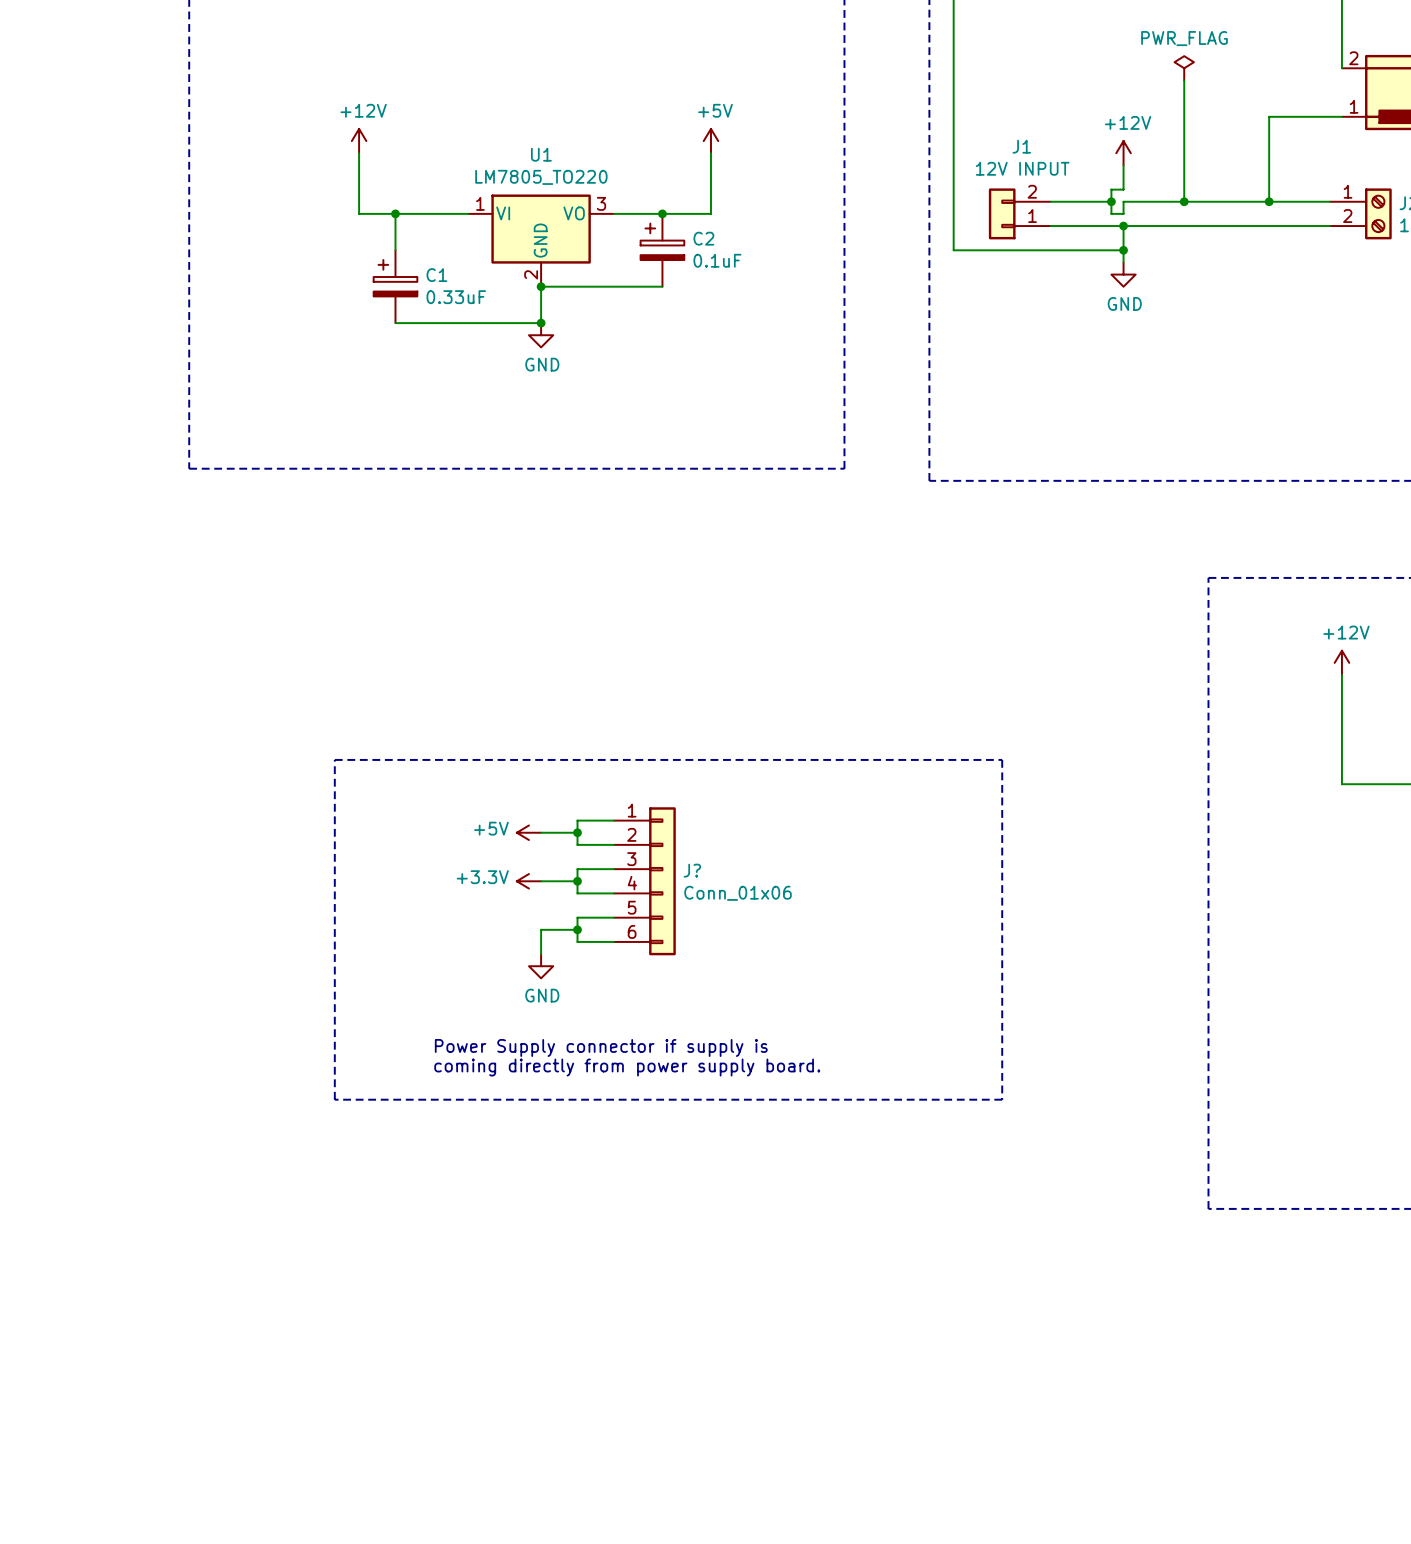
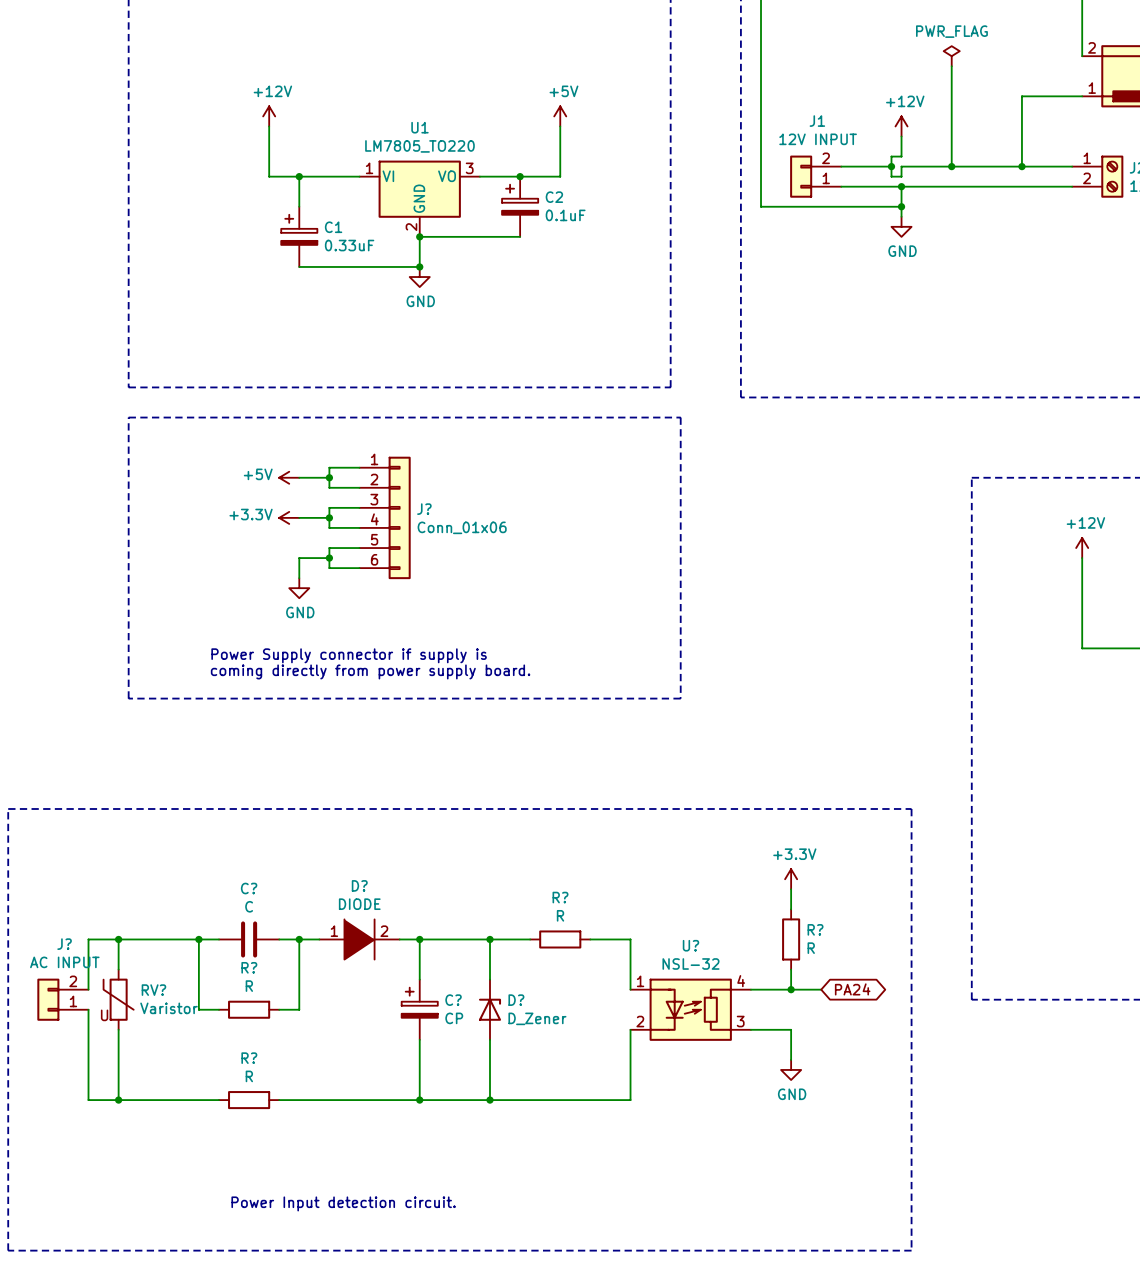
line: none -> (128, 417) (128, 698) (680, 698) (680, 417) (128, 417)
wire: none -> (359, 467) (329, 467) (329, 487) (359, 487)
power symbol: none -> +5V (289, 477)
wire: none -> (299, 477) (329, 477)
junction: none -> (329, 477)
wire: none -> (359, 507) (329, 507) (329, 527) (359, 527)
power symbol: none -> +3.3V (289, 517)
wire: none -> (299, 517) (329, 517)
junction: none -> (329, 517)
J?: none -> Conn_01x06 (385, 517)
wire: none -> (329, 558) (299, 558) (299, 578)
junction: none -> (329, 558)
power symbol: none -> GND (299, 588)
line: (334, 759) (334, 1099) (1002, 1099) (1002, 759) (334, 759) -> none
text: none -> Power Supply connector if supply is (349, 655)
text: none -> coming directly from power supply board. (370, 671)
wire: (613, 820) (577, 820) (577, 844) (613, 844) -> (359, 548) (329, 548) (329, 568) (359, 568)
power symbol: +5V (528, 832) -> none
wire: (541, 832) (577, 832) -> none
junction: (577, 832) -> none
wire: (613, 869) (577, 869) (577, 893) (613, 893) -> none
power symbol: +3.3V (528, 881) -> none
wire: (541, 881) (577, 881) -> none
junction: (577, 881) -> none
J?: Conn_01x06 (644, 881) -> none
wire: (613, 917) (577, 917) (577, 941) (613, 941) -> none
wire: (577, 929) (541, 929) (541, 954) -> none
junction: (577, 929) -> none
power symbol: GND (541, 966) -> none
line: none -> (8, 808) (8, 1250) (911, 1250) (911, 808) (8, 808)
text: Power Supply connector if supply is (601, 1047) -> none
power symbol: none -> +3.3V (791, 879)
text: coming directly from power supply board. (627, 1067) -> none
wire: none -> (791, 889) (791, 909)
wire: none -> (118, 939) (118, 969)
junction: none -> (118, 939)
wire: none -> (198, 939) (198, 1009) (218, 1009)
junction: none -> (198, 939)
wire: none -> (218, 939) (88, 939) (88, 989)
C?: none -> C (249, 939)
wire: none -> (279, 939) (319, 939)
wire: none -> (299, 939) (299, 1009) (279, 1009)
junction: none -> (299, 939)
D?: none -> DIODE (359, 939)
wire: none -> (399, 939) (530, 939)
wire: none -> (419, 939) (419, 979)
junction: none -> (419, 939)
wire: none -> (490, 939) (490, 979)
junction: none -> (490, 939)
R?: none -> R (560, 939)
wire: none -> (590, 939) (630, 939) (630, 989)
R?: none -> R (791, 939)
wire: none -> (791, 969) (791, 989)
wire: none -> (750, 989) (821, 989)
junction: none -> (791, 989)
global label: none -> PA24 (852, 989)
J?: none -> AC INPUT (62, 999)
RV?: none -> Varistor (118, 999)
wire: none -> (88, 1009) (88, 1100) (218, 1100)
R?: none -> R (249, 1009)
C?: none -> CP (419, 1009)
D?: none -> D_Zener (490, 1009)
U?: none -> NSL-32 (690, 1009)
wire: none -> (118, 1029) (118, 1100)
wire: none -> (630, 1029) (630, 1100) (279, 1100)
wire: none -> (750, 1029) (791, 1029) (791, 1059)
wire: none -> (419, 1039) (419, 1100)
wire: none -> (490, 1039) (490, 1100)
power symbol: none -> GND (791, 1069)
junction: none -> (118, 1100)
R?: none -> R (249, 1100)
junction: none -> (419, 1100)
junction: none -> (490, 1100)
text: none -> Power Input detection circuit. (343, 1203)

